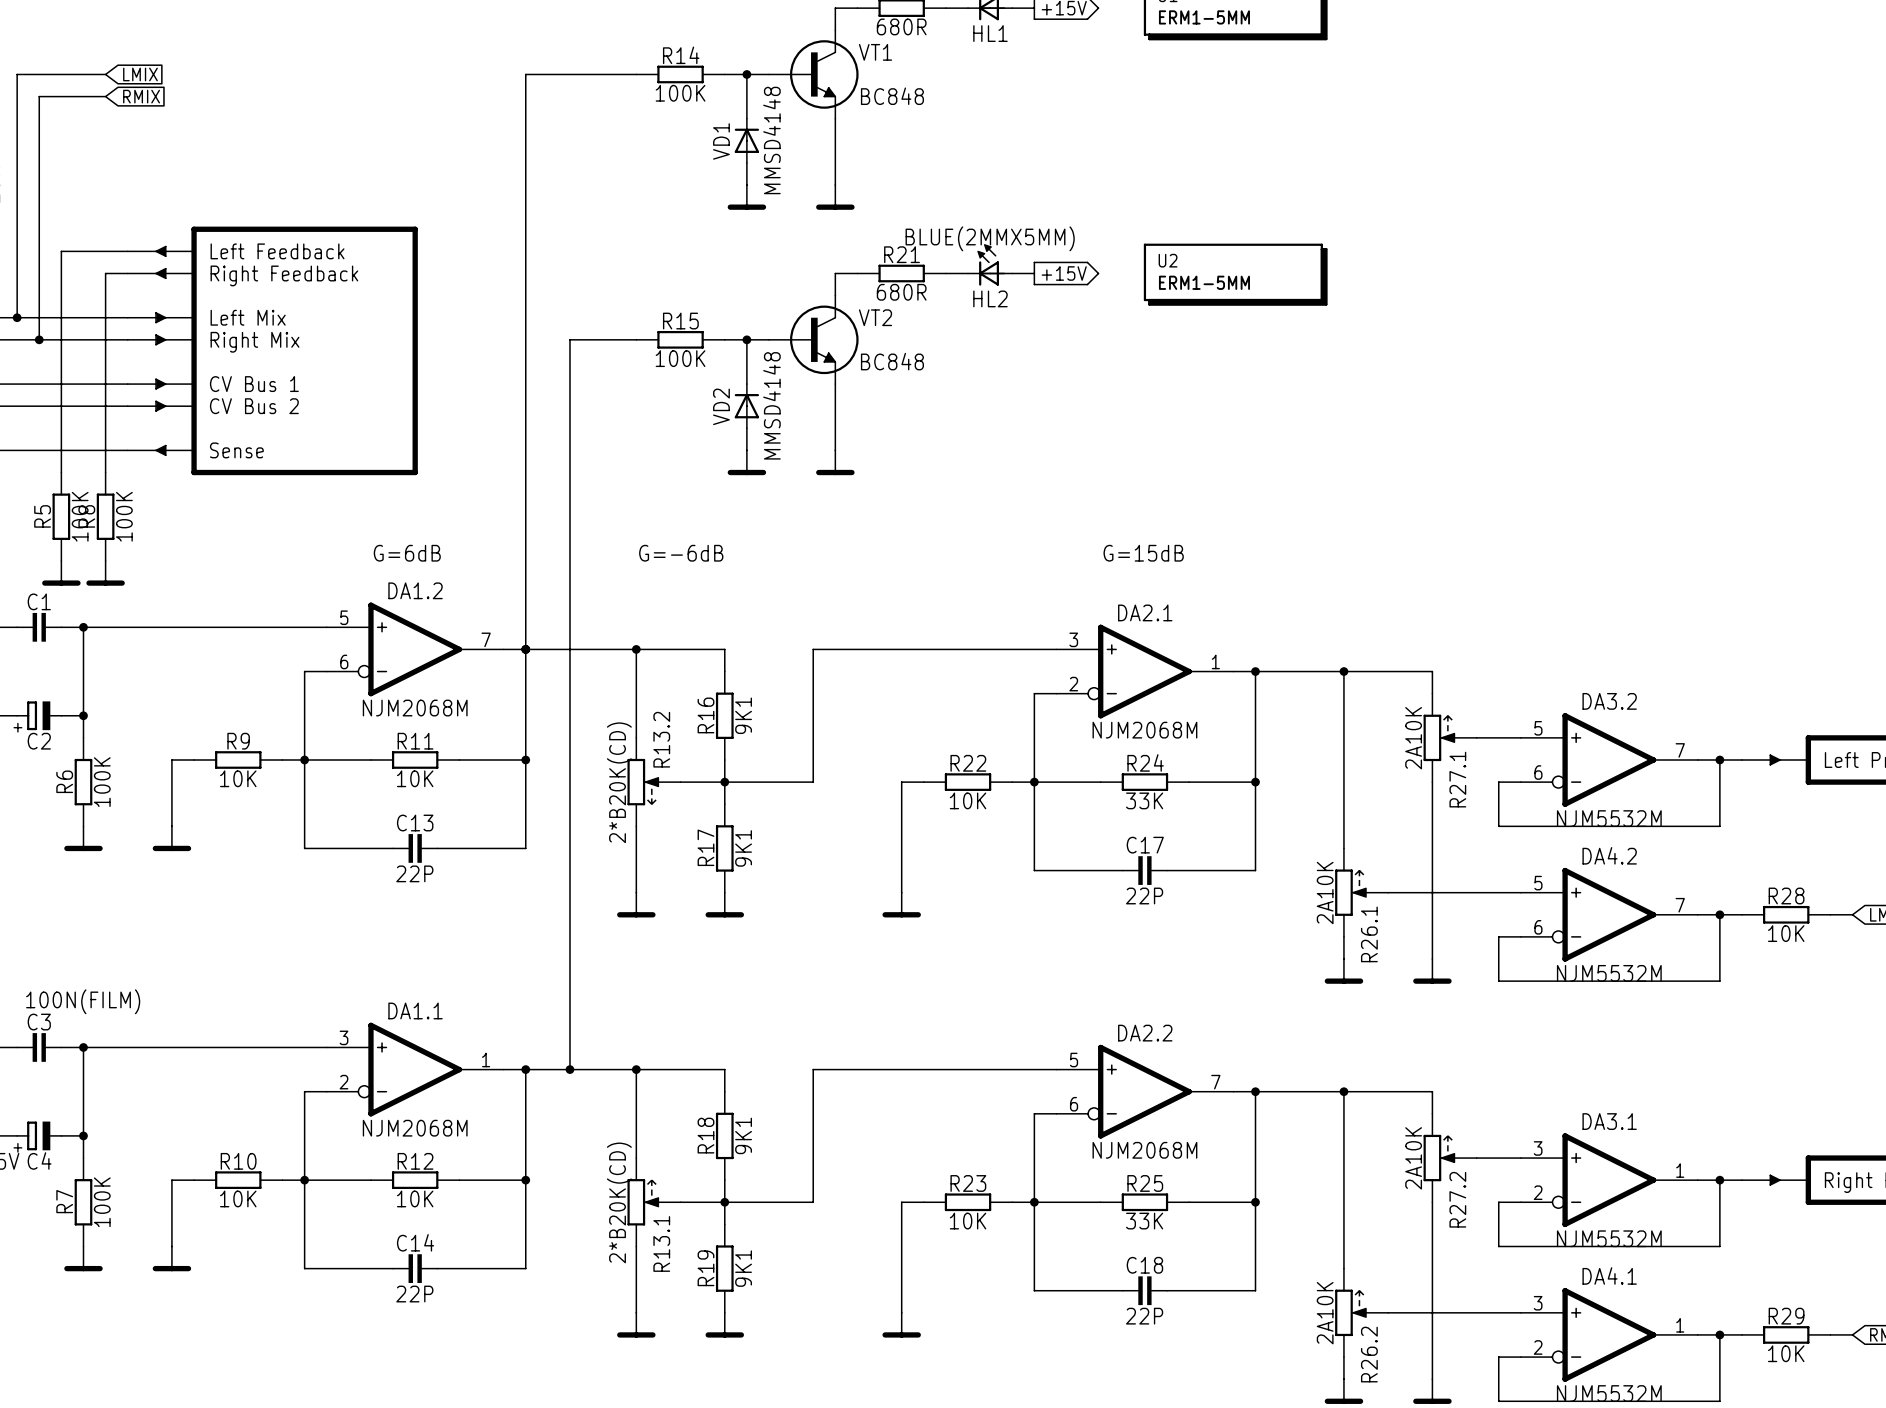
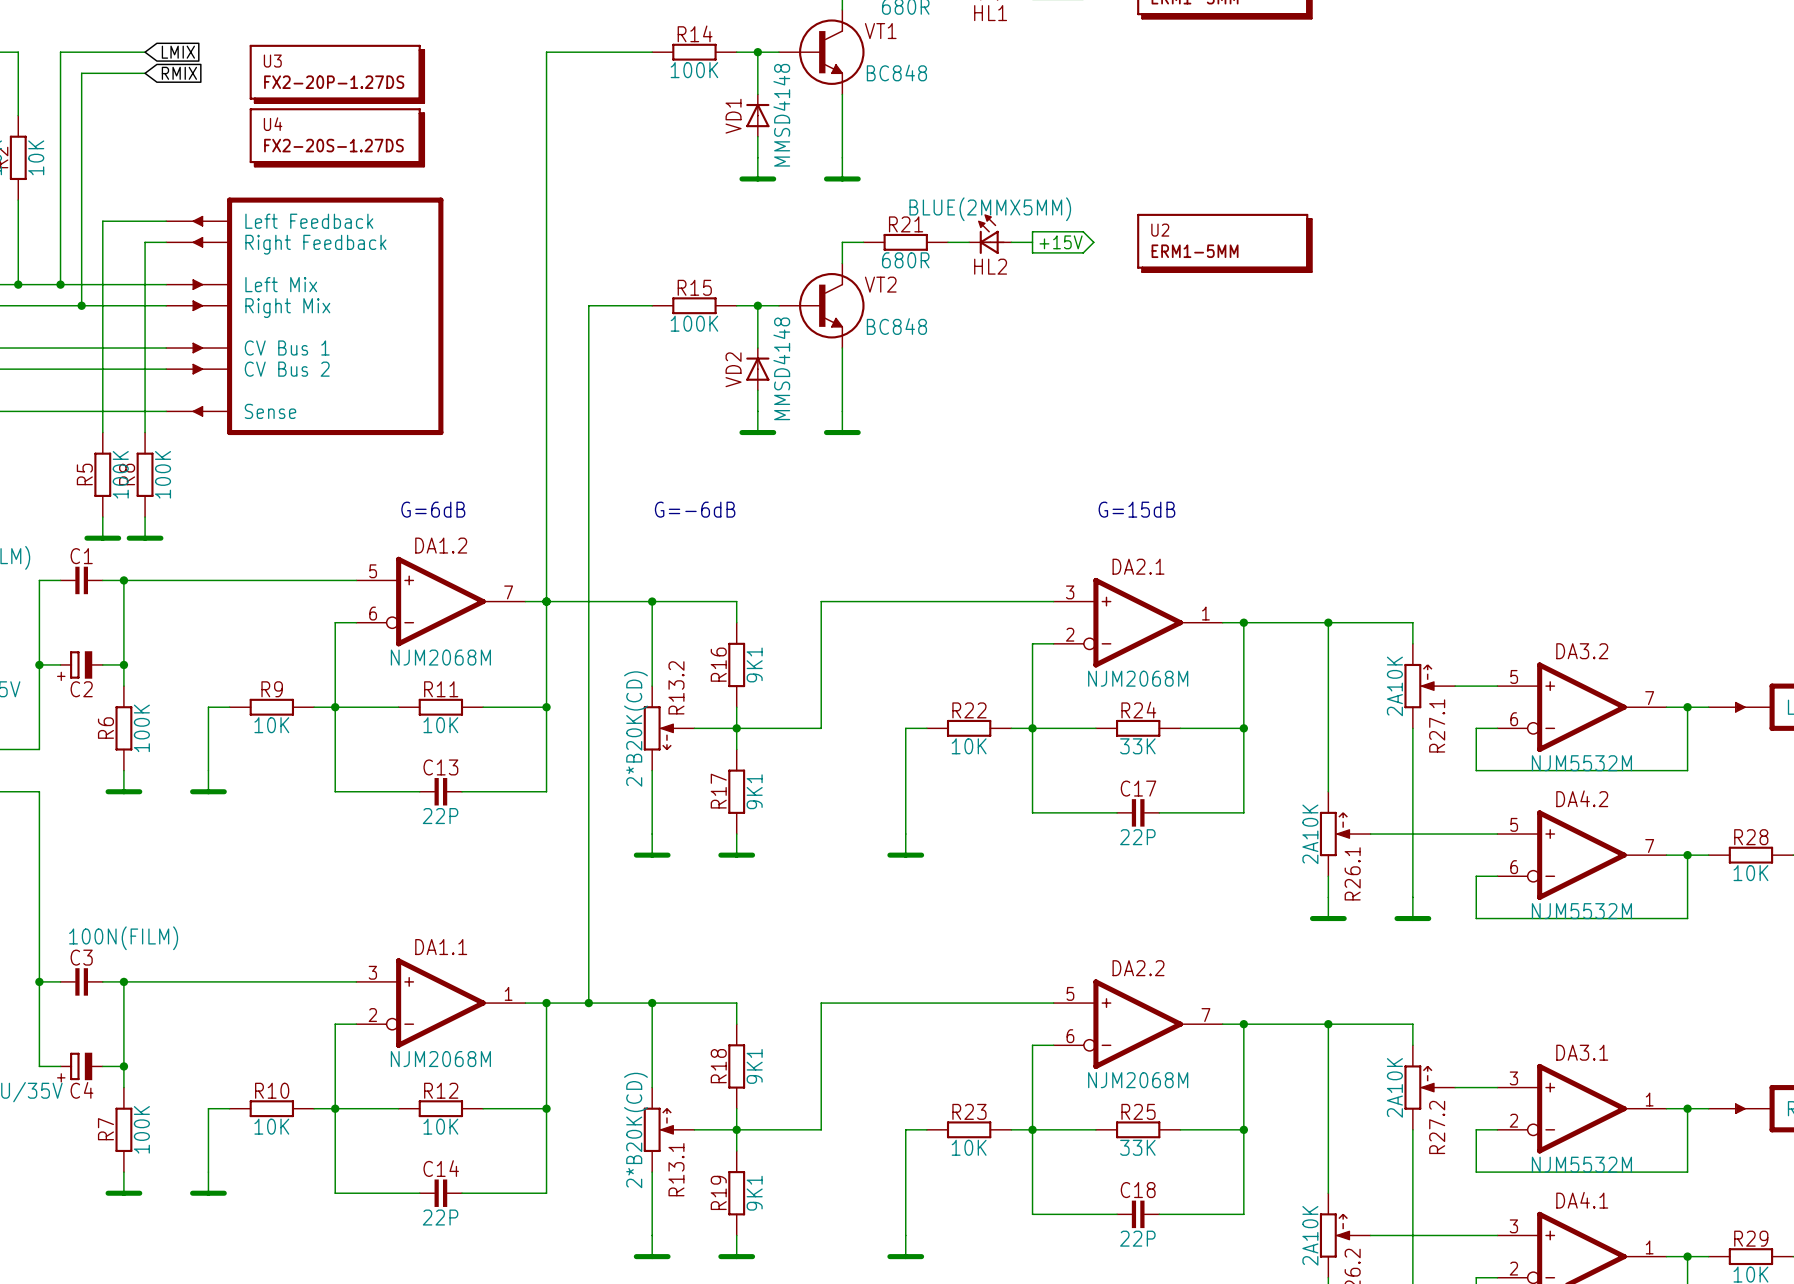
U3: none -> FX2-20P-1.27DS (337, 74)
U4: none -> FX2-20S-1.27DS (337, 137)

